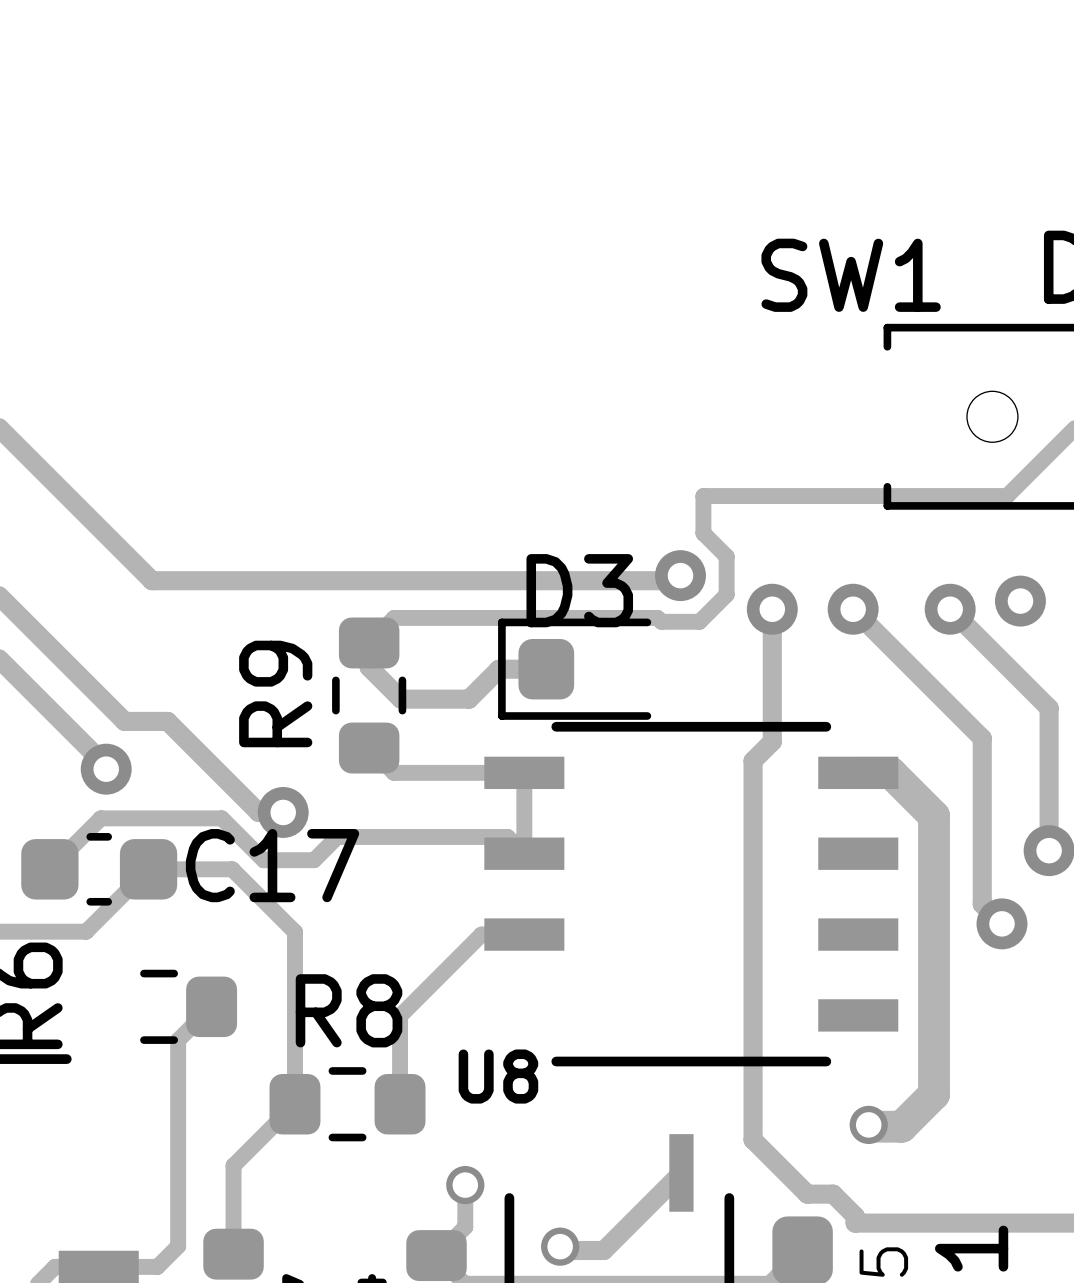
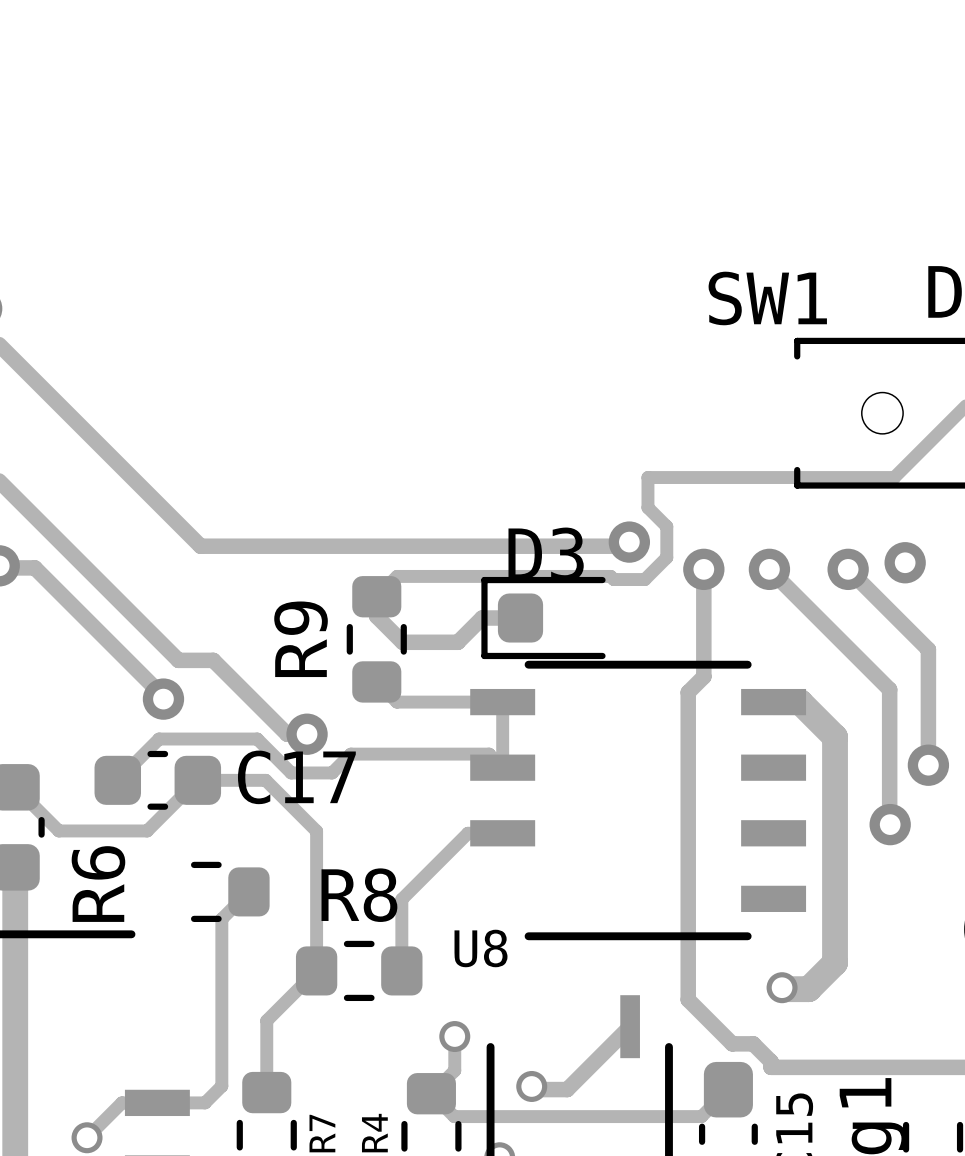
track: (982, 738) (982, 904) (1001, 923) -> (874, 674) (889, 689) (889, 824)

